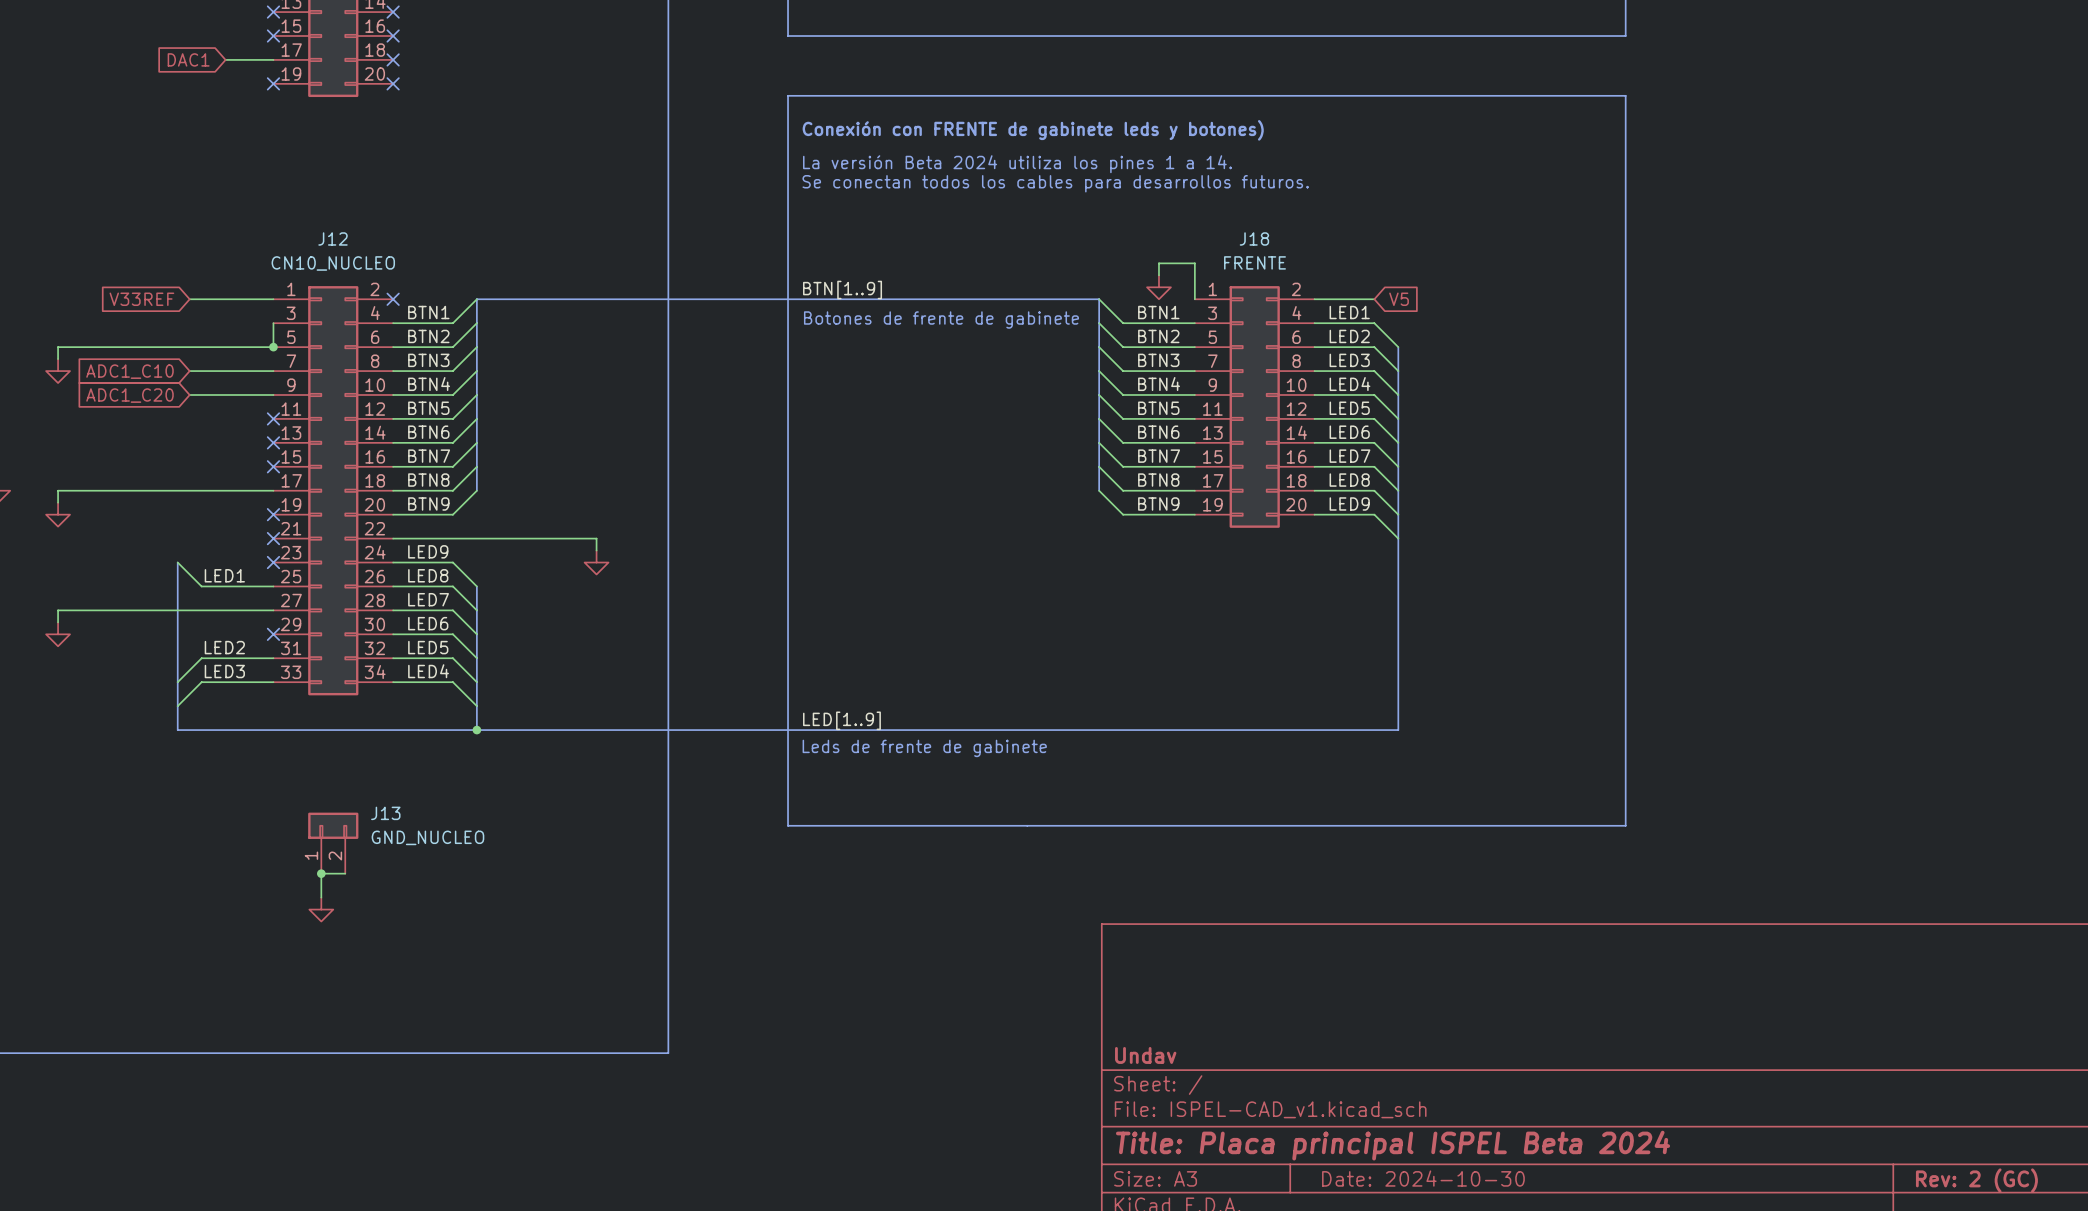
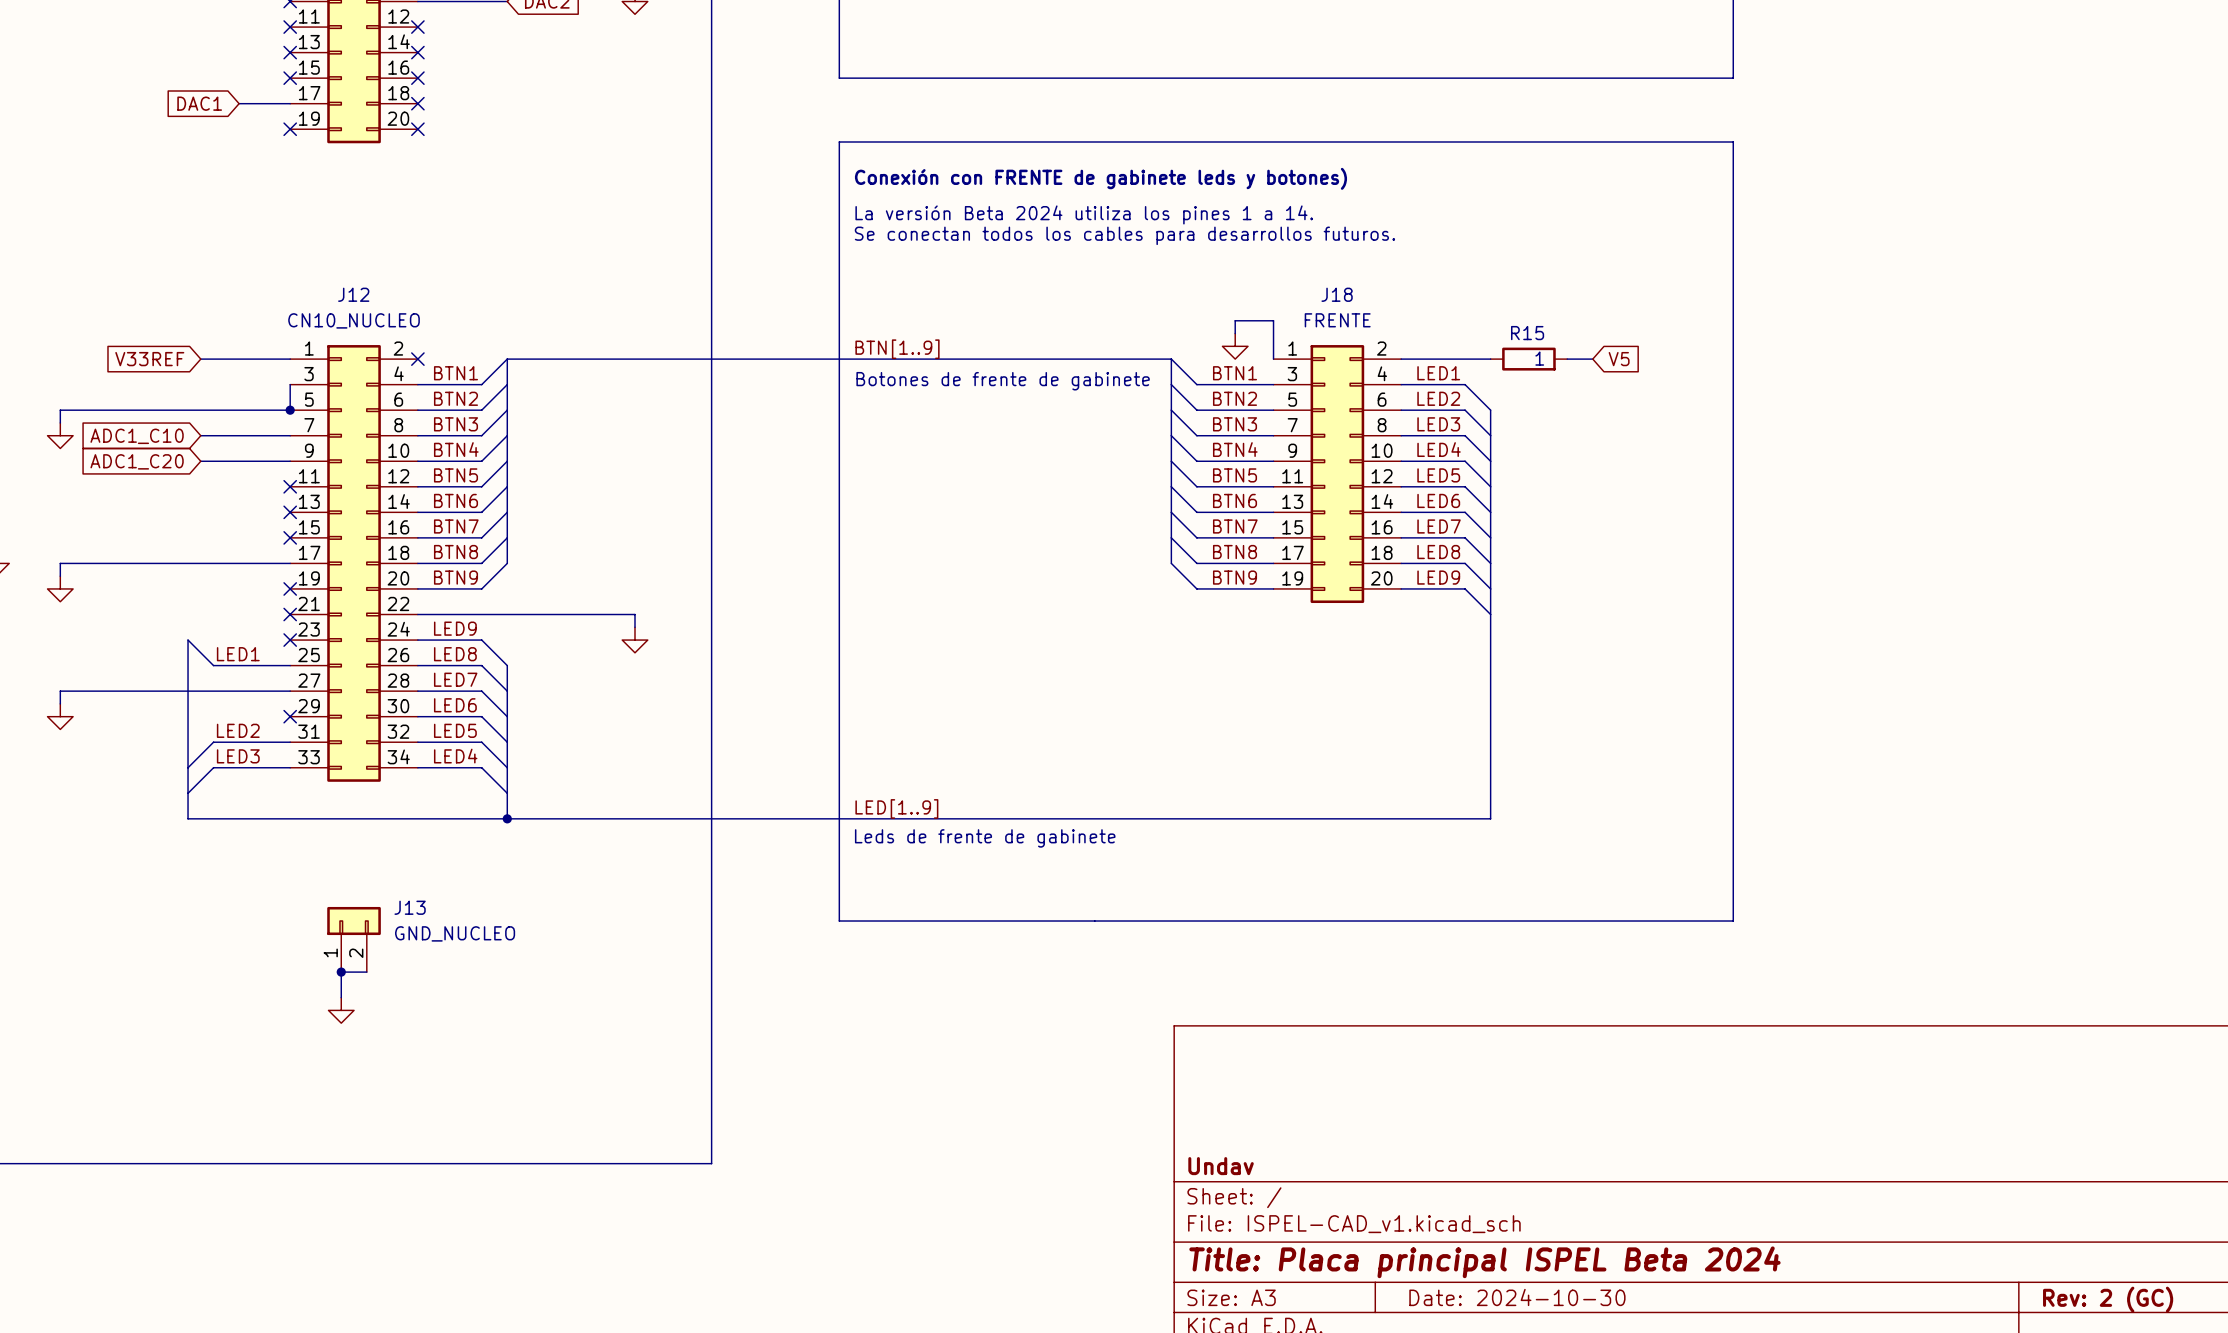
wire: none -> (1465, 359) (1490, 359)
global label position: V5 (1399, 299) -> V5 (1619, 359)
R15: none -> 1 (1528, 359)
wire: none -> (1567, 359) (1592, 359)

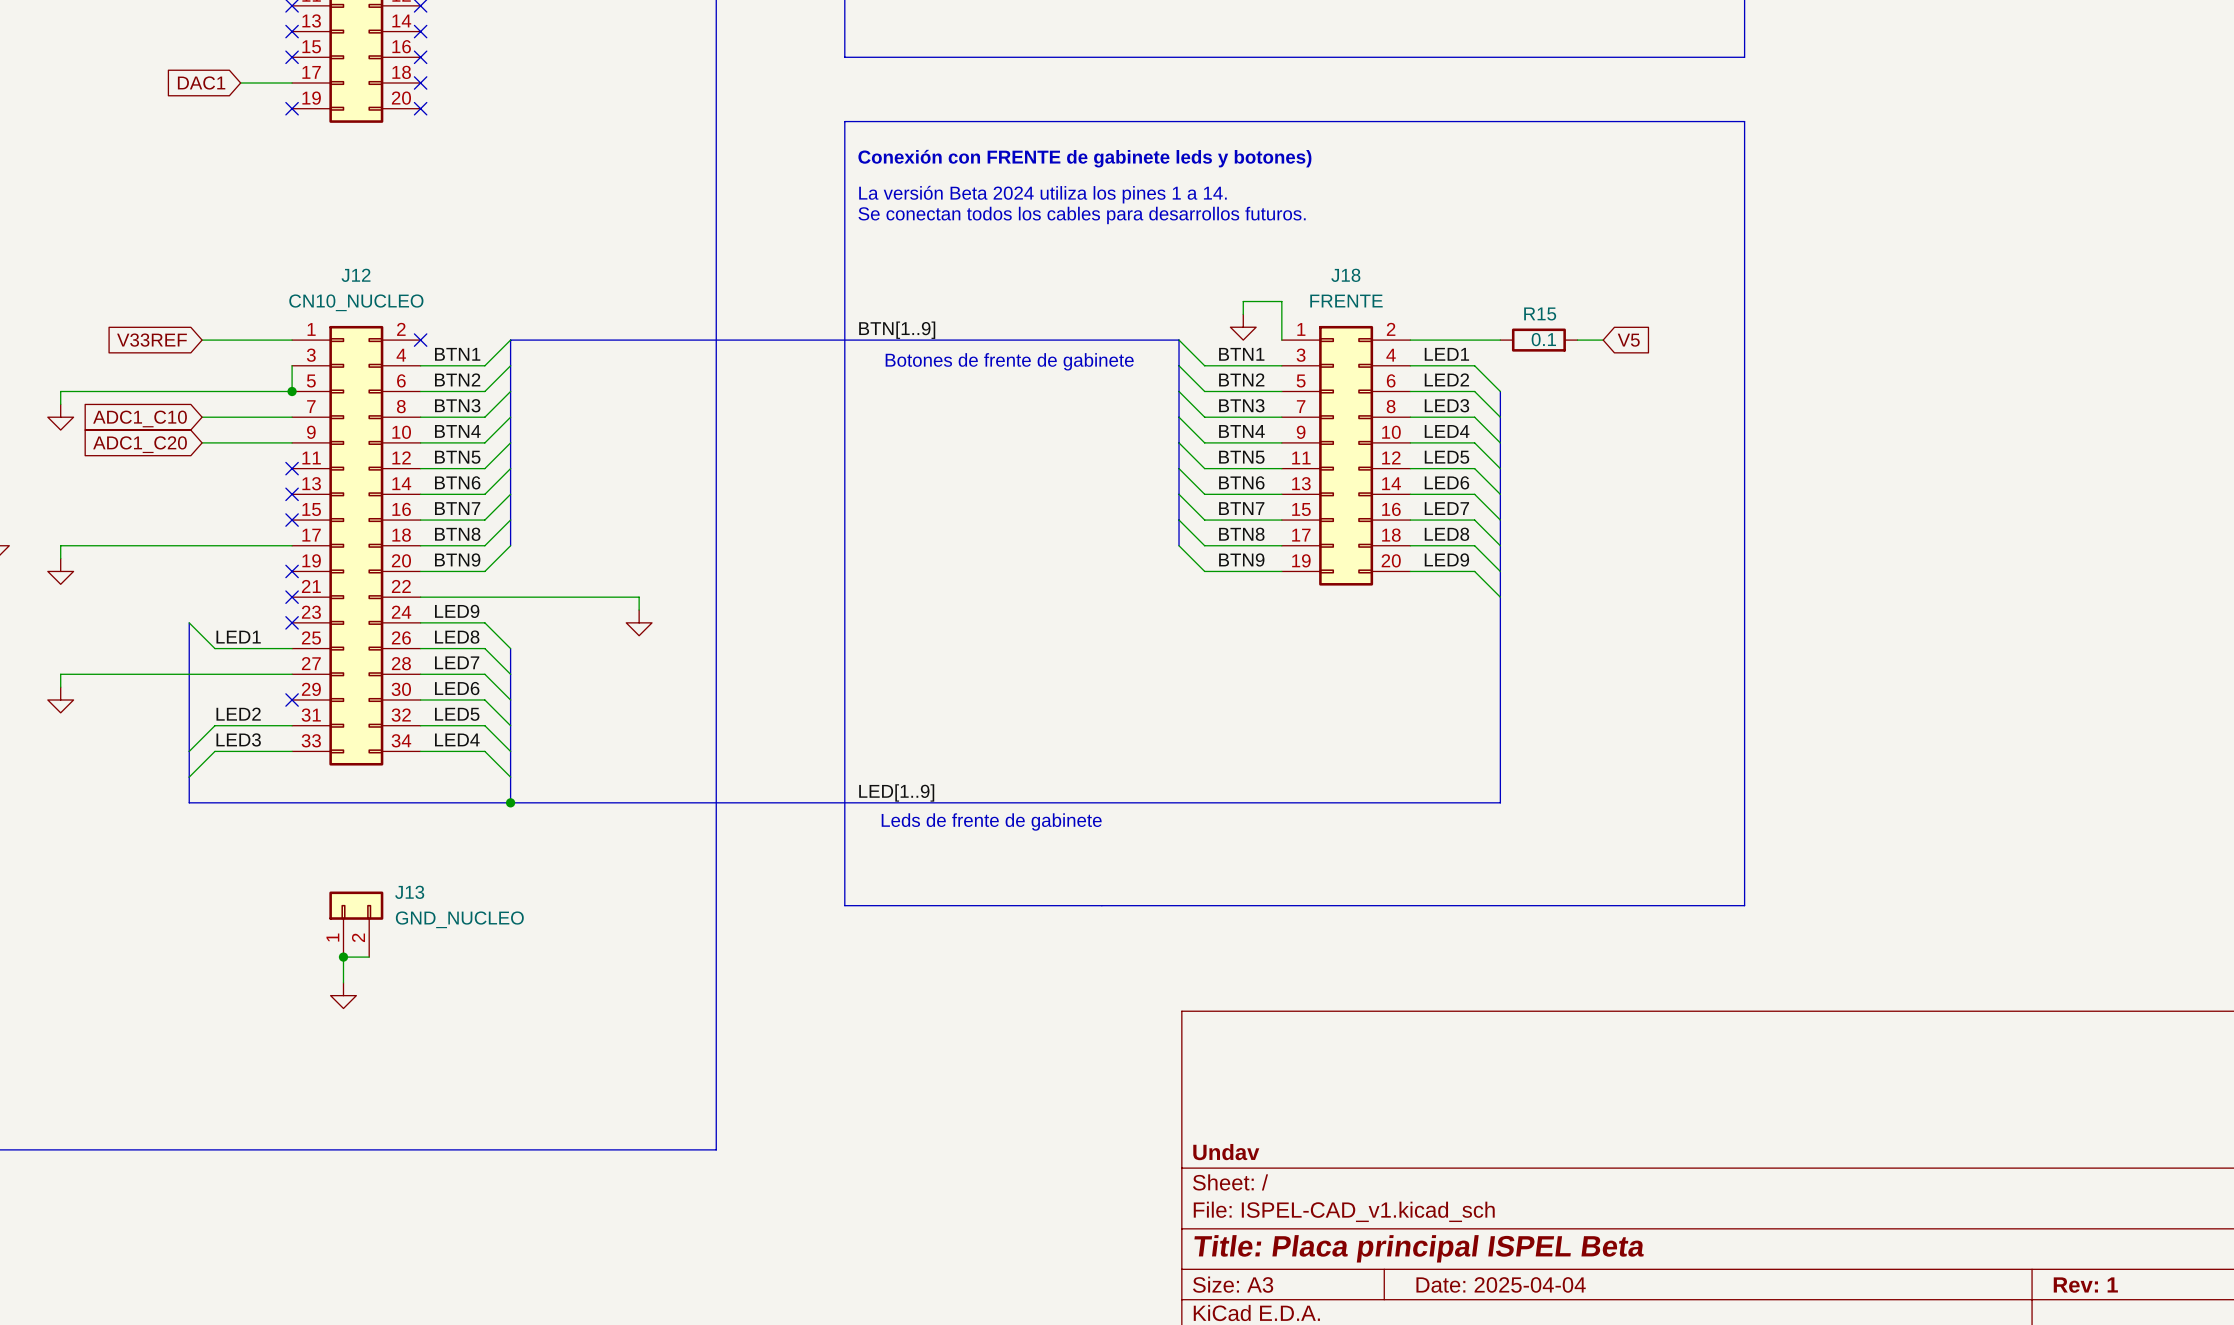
R15 value: 1 (1539, 358) -> 0.1 (1543, 339)
title block: Title: Placa principal ISPEL Beta 2024 (1484, 1262) -> Title: Placa principal ISPEL Beta (1419, 1248)
title block: Date: 2024-10-30 (1517, 1297) -> Date: 2025-04-04 (1501, 1284)
title block: Rev: 2 (GC) (2108, 1299) -> Rev: 1 (2085, 1285)

